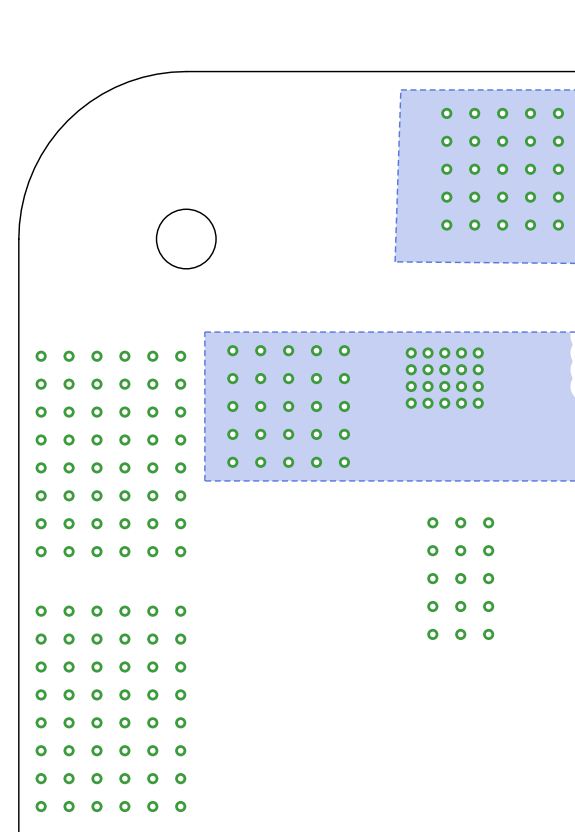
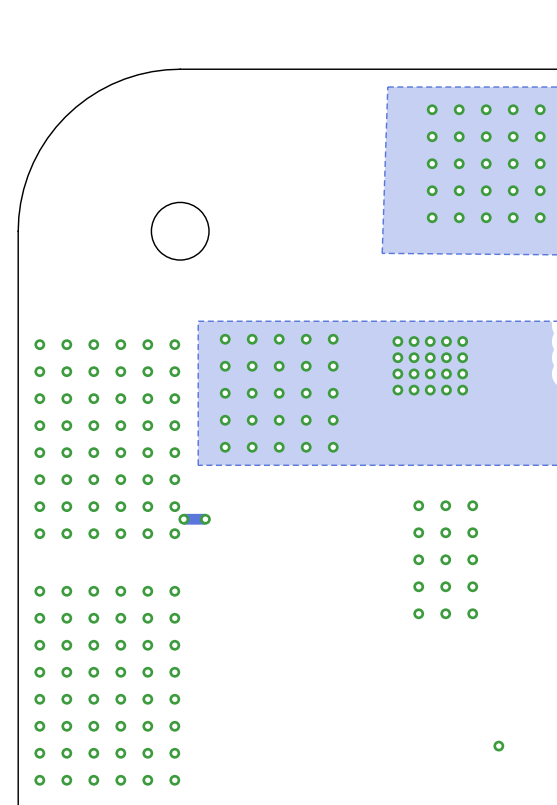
part: none -> (194, 519)
via: none -> (498, 746)

